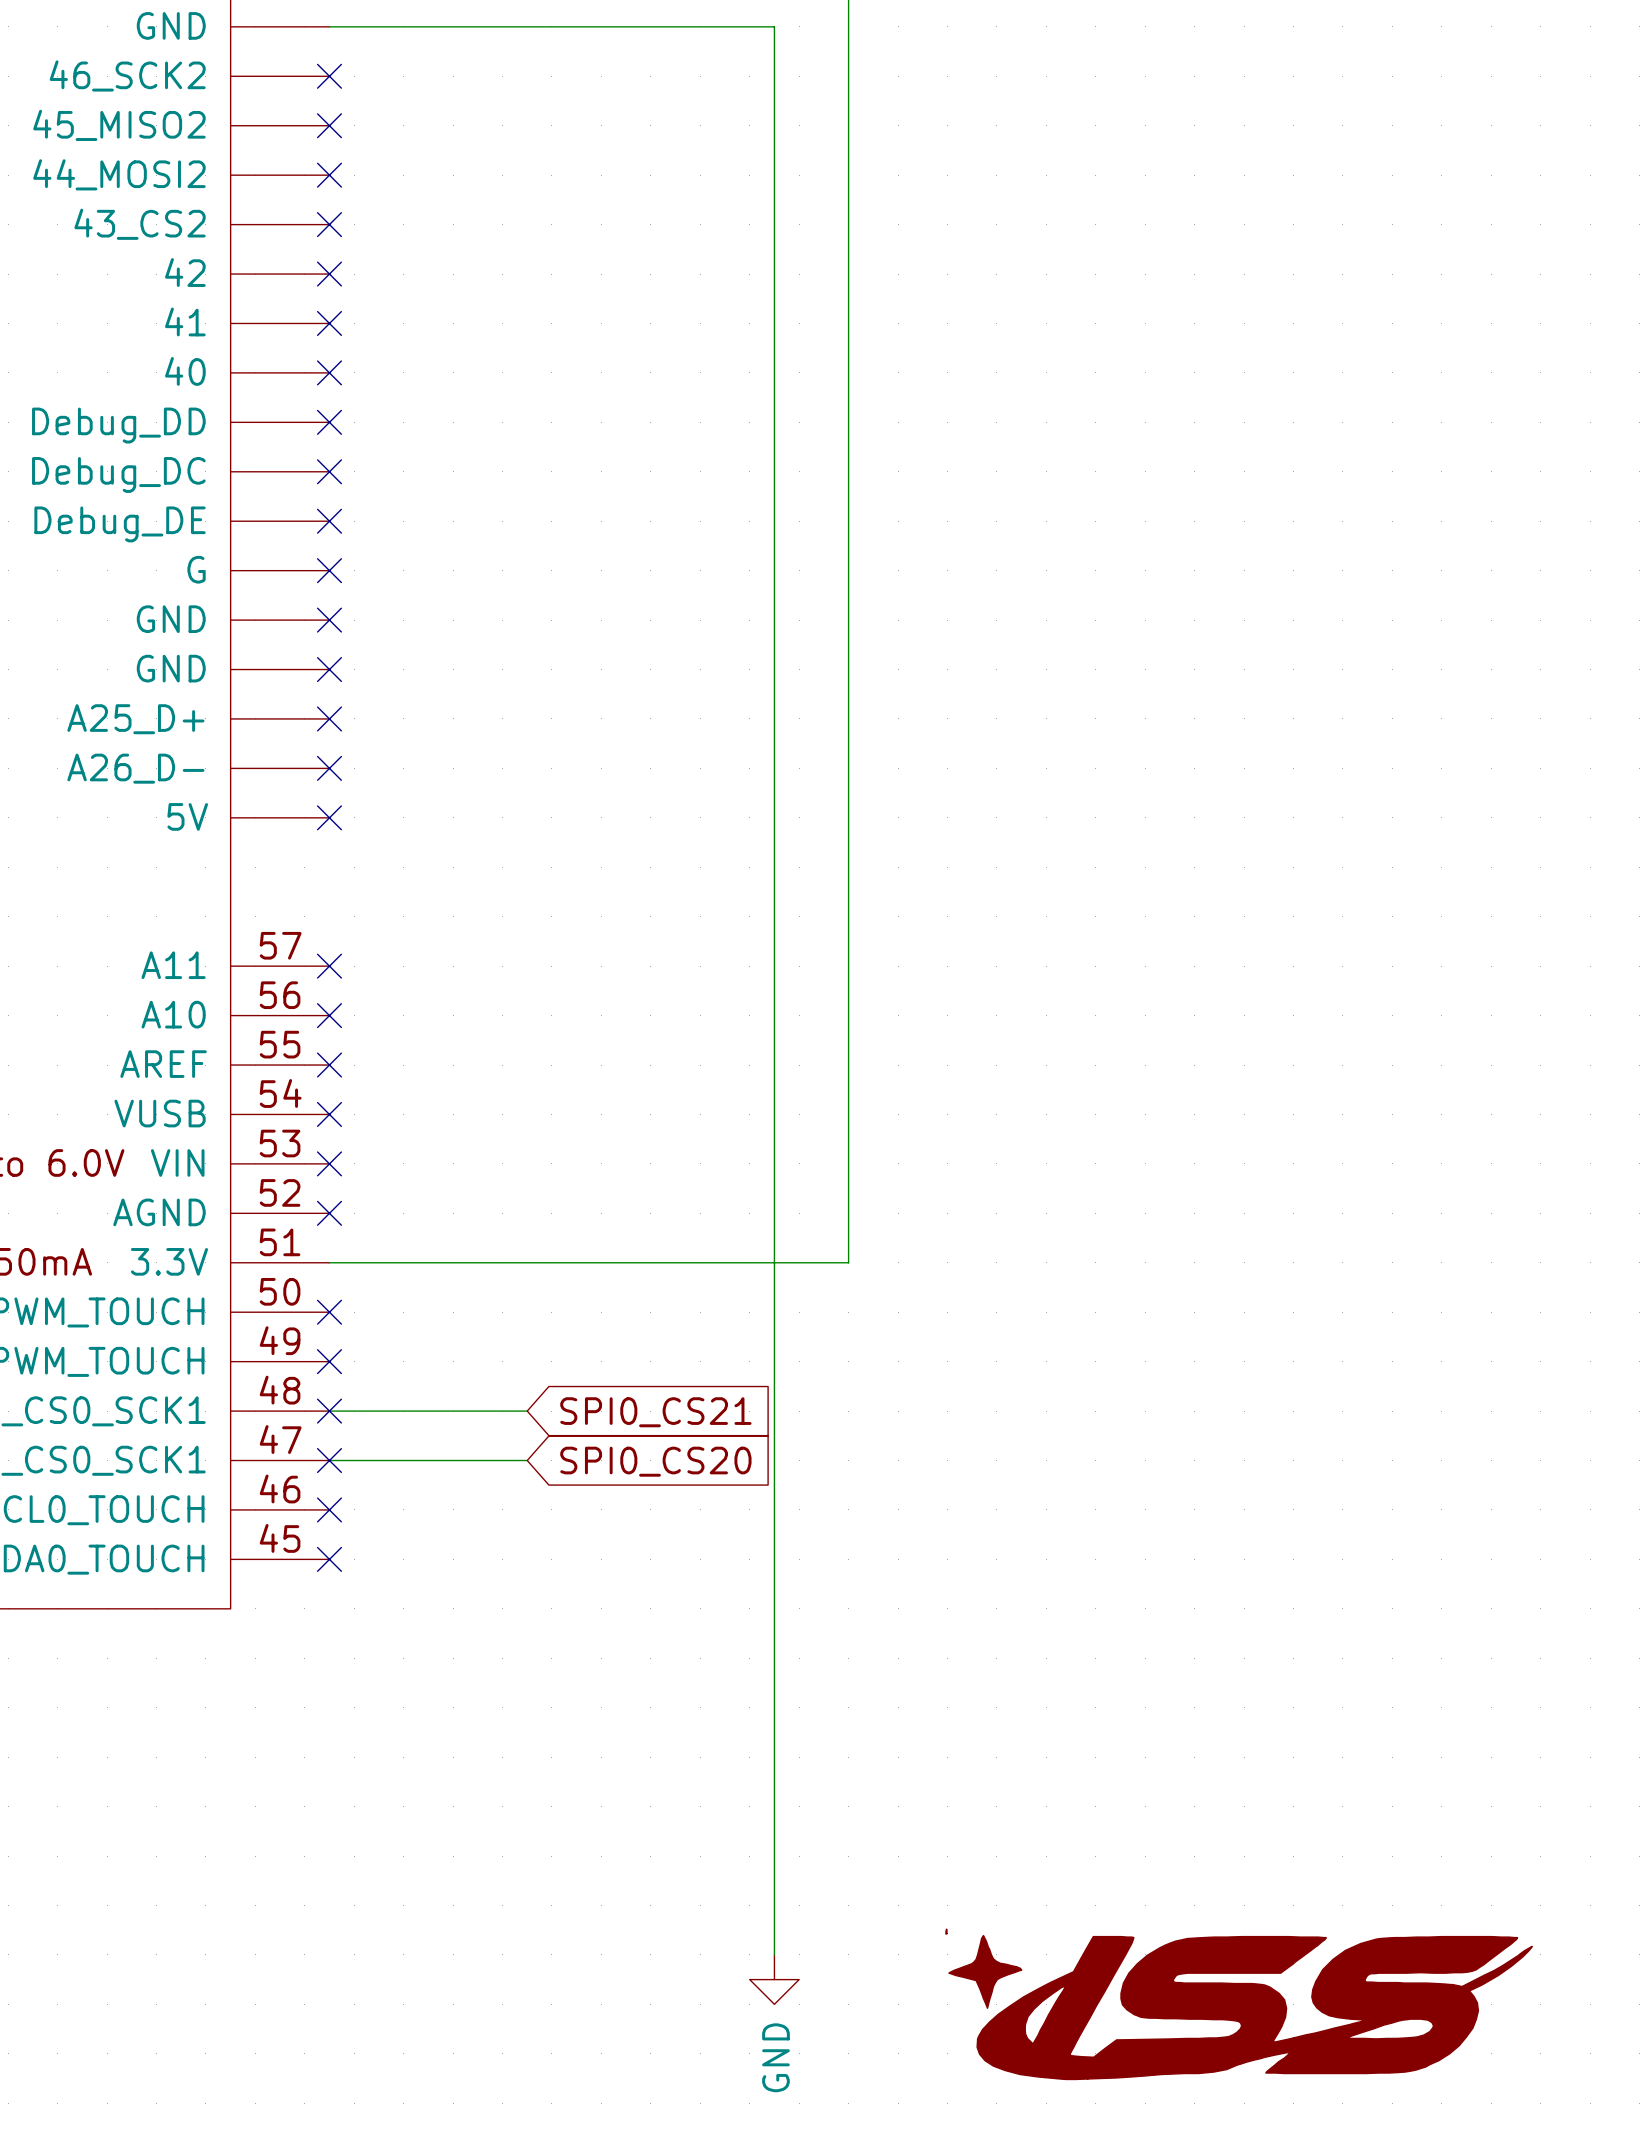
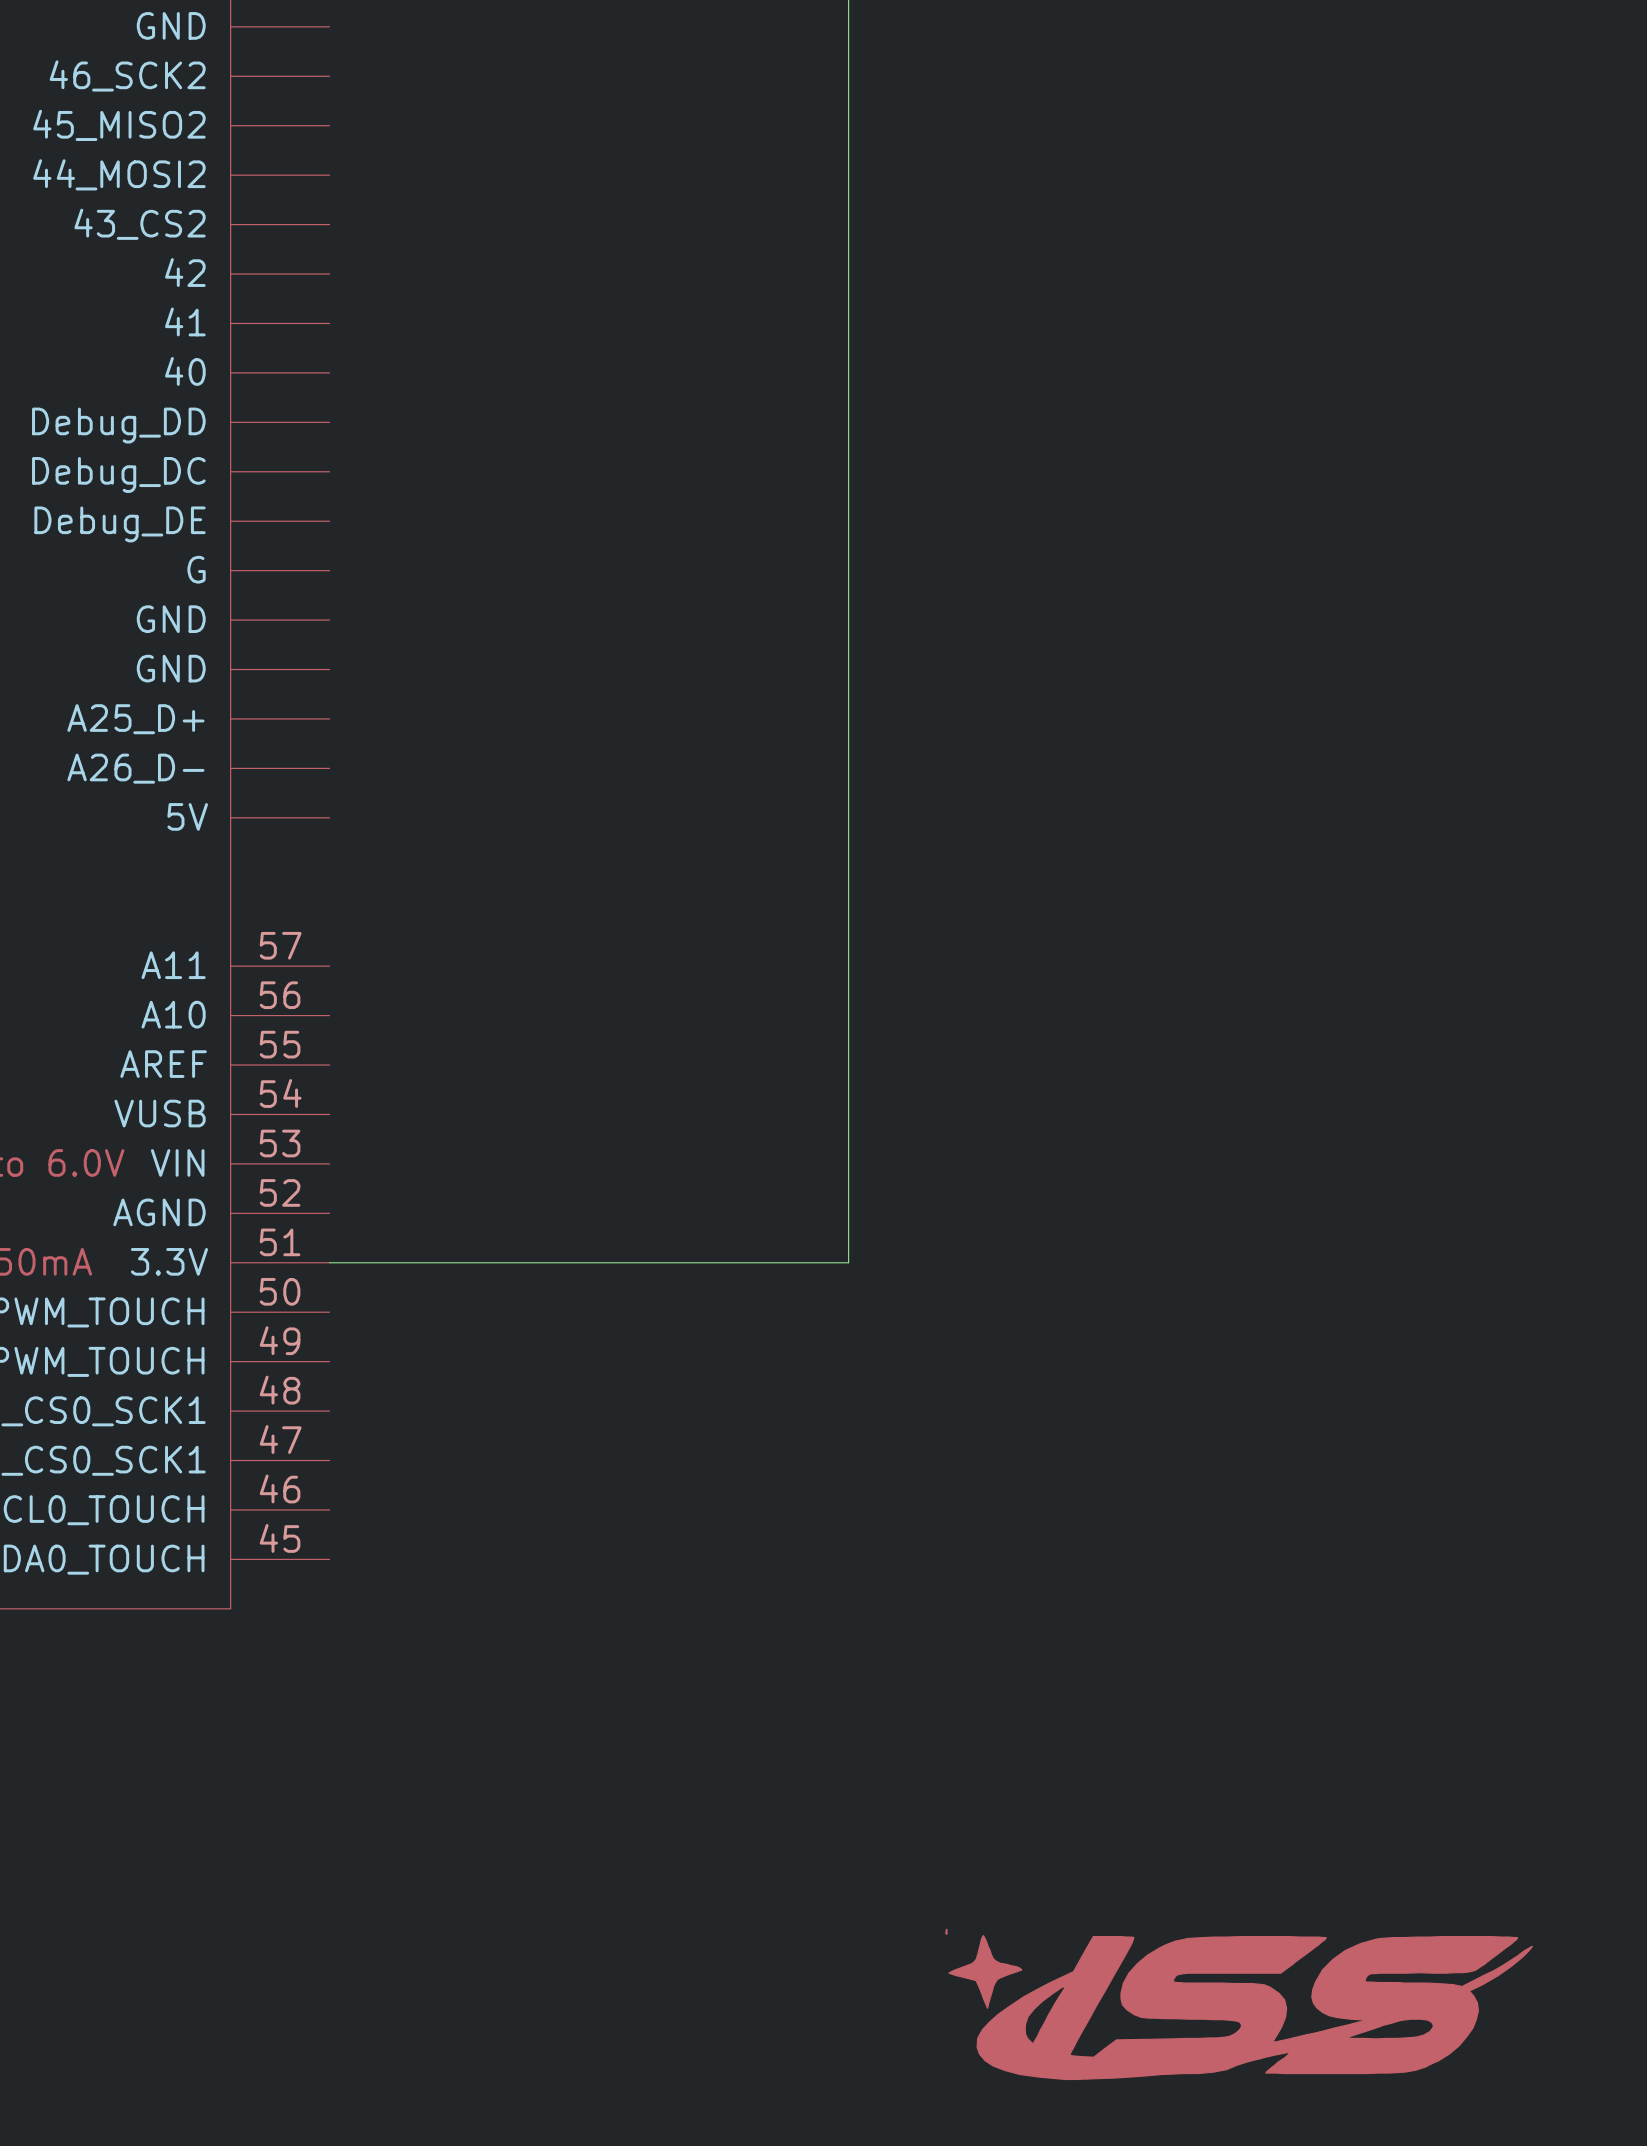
wire: (329, 26) (774, 26) (774, 1954) -> none
no-connect mark: (329, 76) -> none
no-connect mark: (329, 125) -> none
no-connect mark: (329, 175) -> none
no-connect mark: (329, 224) -> none
no-connect mark: (329, 274) -> none
no-connect mark: (329, 323) -> none
no-connect mark: (329, 372) -> none
no-connect mark: (329, 422) -> none
no-connect mark: (329, 471) -> none
no-connect mark: (329, 521) -> none
no-connect mark: (329, 570) -> none
no-connect mark: (329, 620) -> none
no-connect mark: (329, 669) -> none
no-connect mark: (329, 718) -> none
no-connect mark: (329, 768) -> none
no-connect mark: (329, 817) -> none
no-connect mark: (329, 966) -> none
no-connect mark: (329, 1015) -> none
no-connect mark: (329, 1065) -> none
no-connect mark: (329, 1114) -> none
no-connect mark: (329, 1163) -> none
no-connect mark: (329, 1213) -> none
no-connect mark: (329, 1312) -> none
no-connect mark: (329, 1361) -> none
wire: (329, 1411) (527, 1411) -> none
no-connect mark: (329, 1411) -> none
global label: SPI0_CS21 (655, 1412) -> none
wire: (329, 1460) (527, 1460) -> none
no-connect mark: (329, 1460) -> none
global label: SPI0_CS20 (655, 1461) -> none
no-connect mark: (329, 1509) -> none
no-connect mark: (329, 1559) -> none
power symbol: GND (774, 1979) -> none

